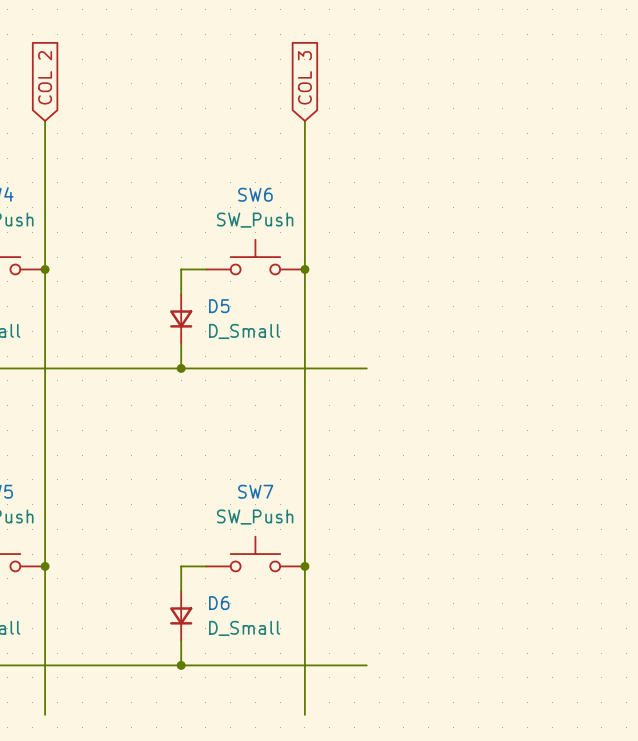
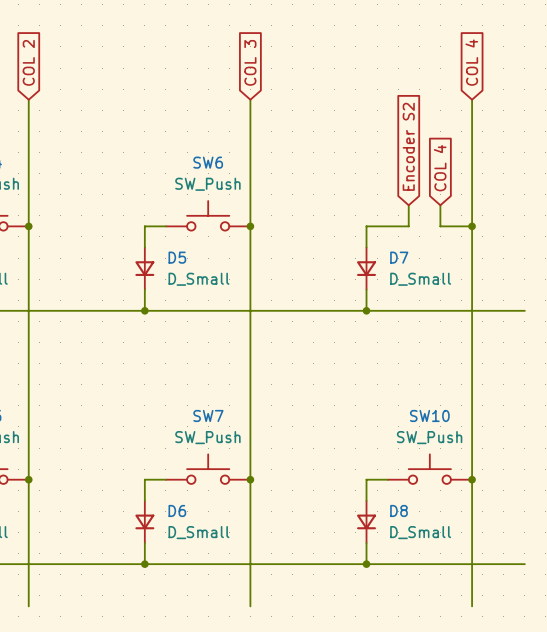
global label: none -> COL 4 (471, 62)
wire: none -> (472, 99) (472, 606)
global label: none -> Encoder S2 (408, 146)
global label: none -> COL 4 (440, 168)
wire: none -> (408, 205) (408, 226) (366, 226) (366, 247)
wire: none -> (440, 205) (440, 226) (472, 226)
junction: none -> (472, 226)
D7: none -> D_Small (366, 268)
wire: none -> (366, 289) (366, 310)
wire: none -> (303, 310) (524, 310)
junction: none -> (366, 310)
SW10: none -> SW_Push (429, 469)
wire: none -> (387, 479) (366, 479) (366, 500)
junction: none -> (472, 479)
D8: none -> D_Small (366, 521)
wire: none -> (366, 543) (366, 564)
wire: none -> (303, 564) (524, 564)
junction: none -> (366, 564)

